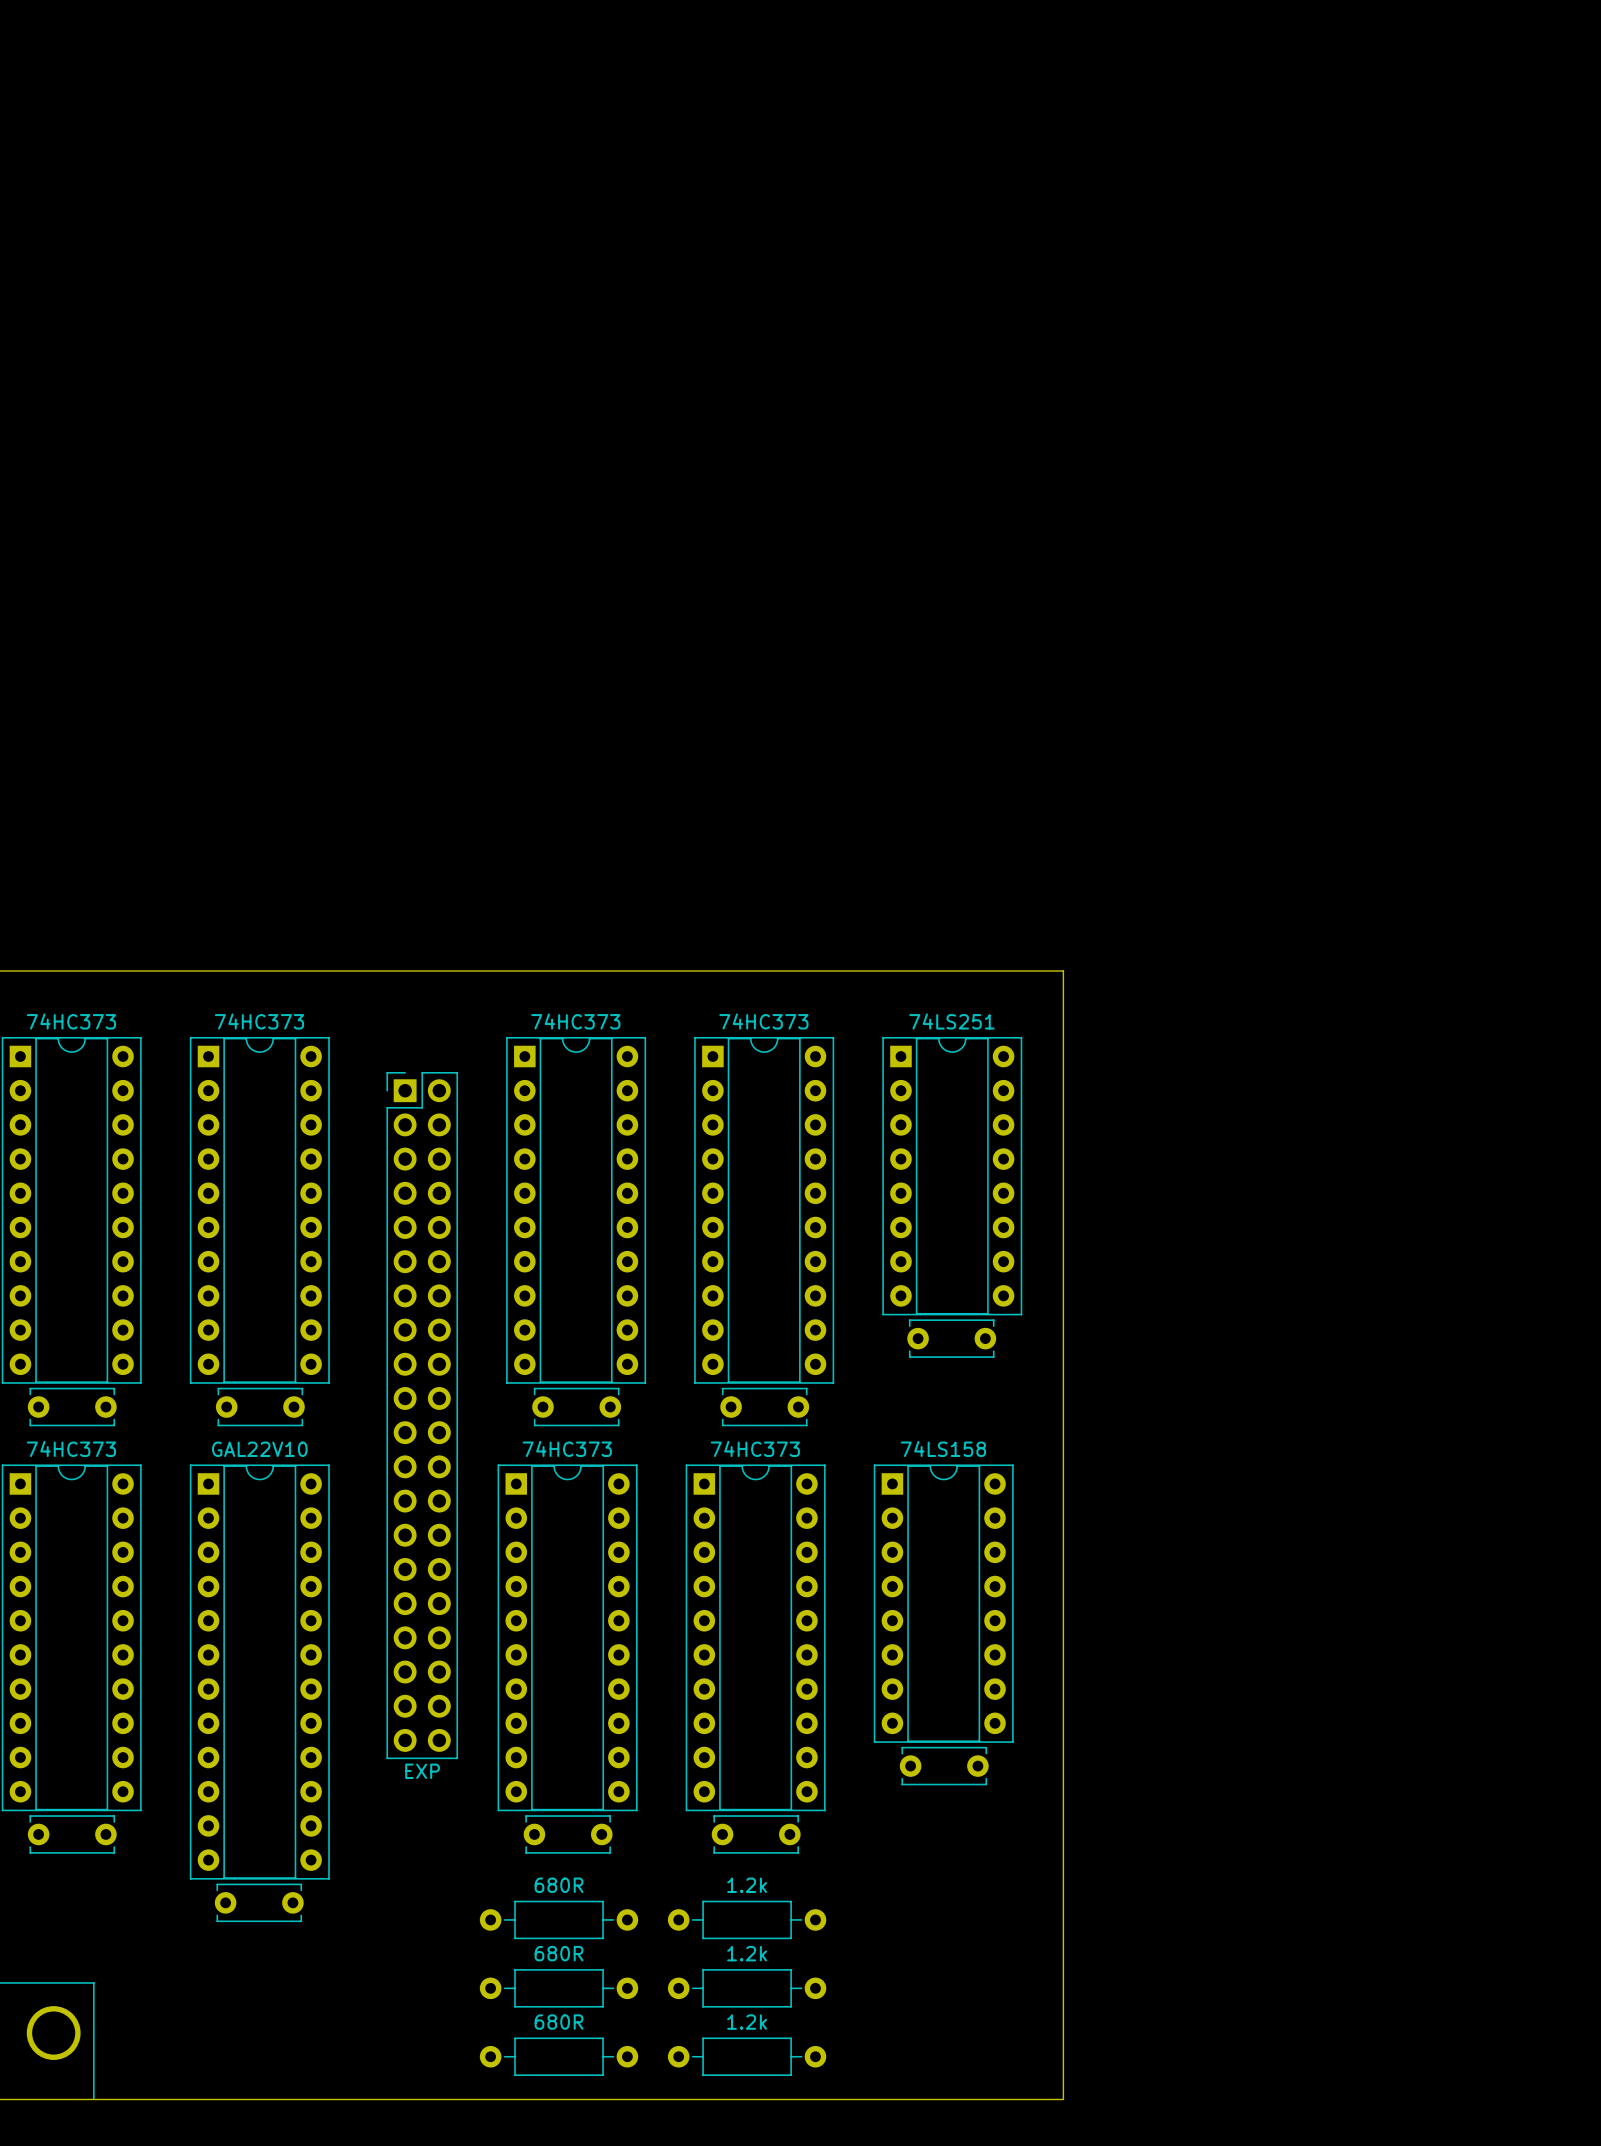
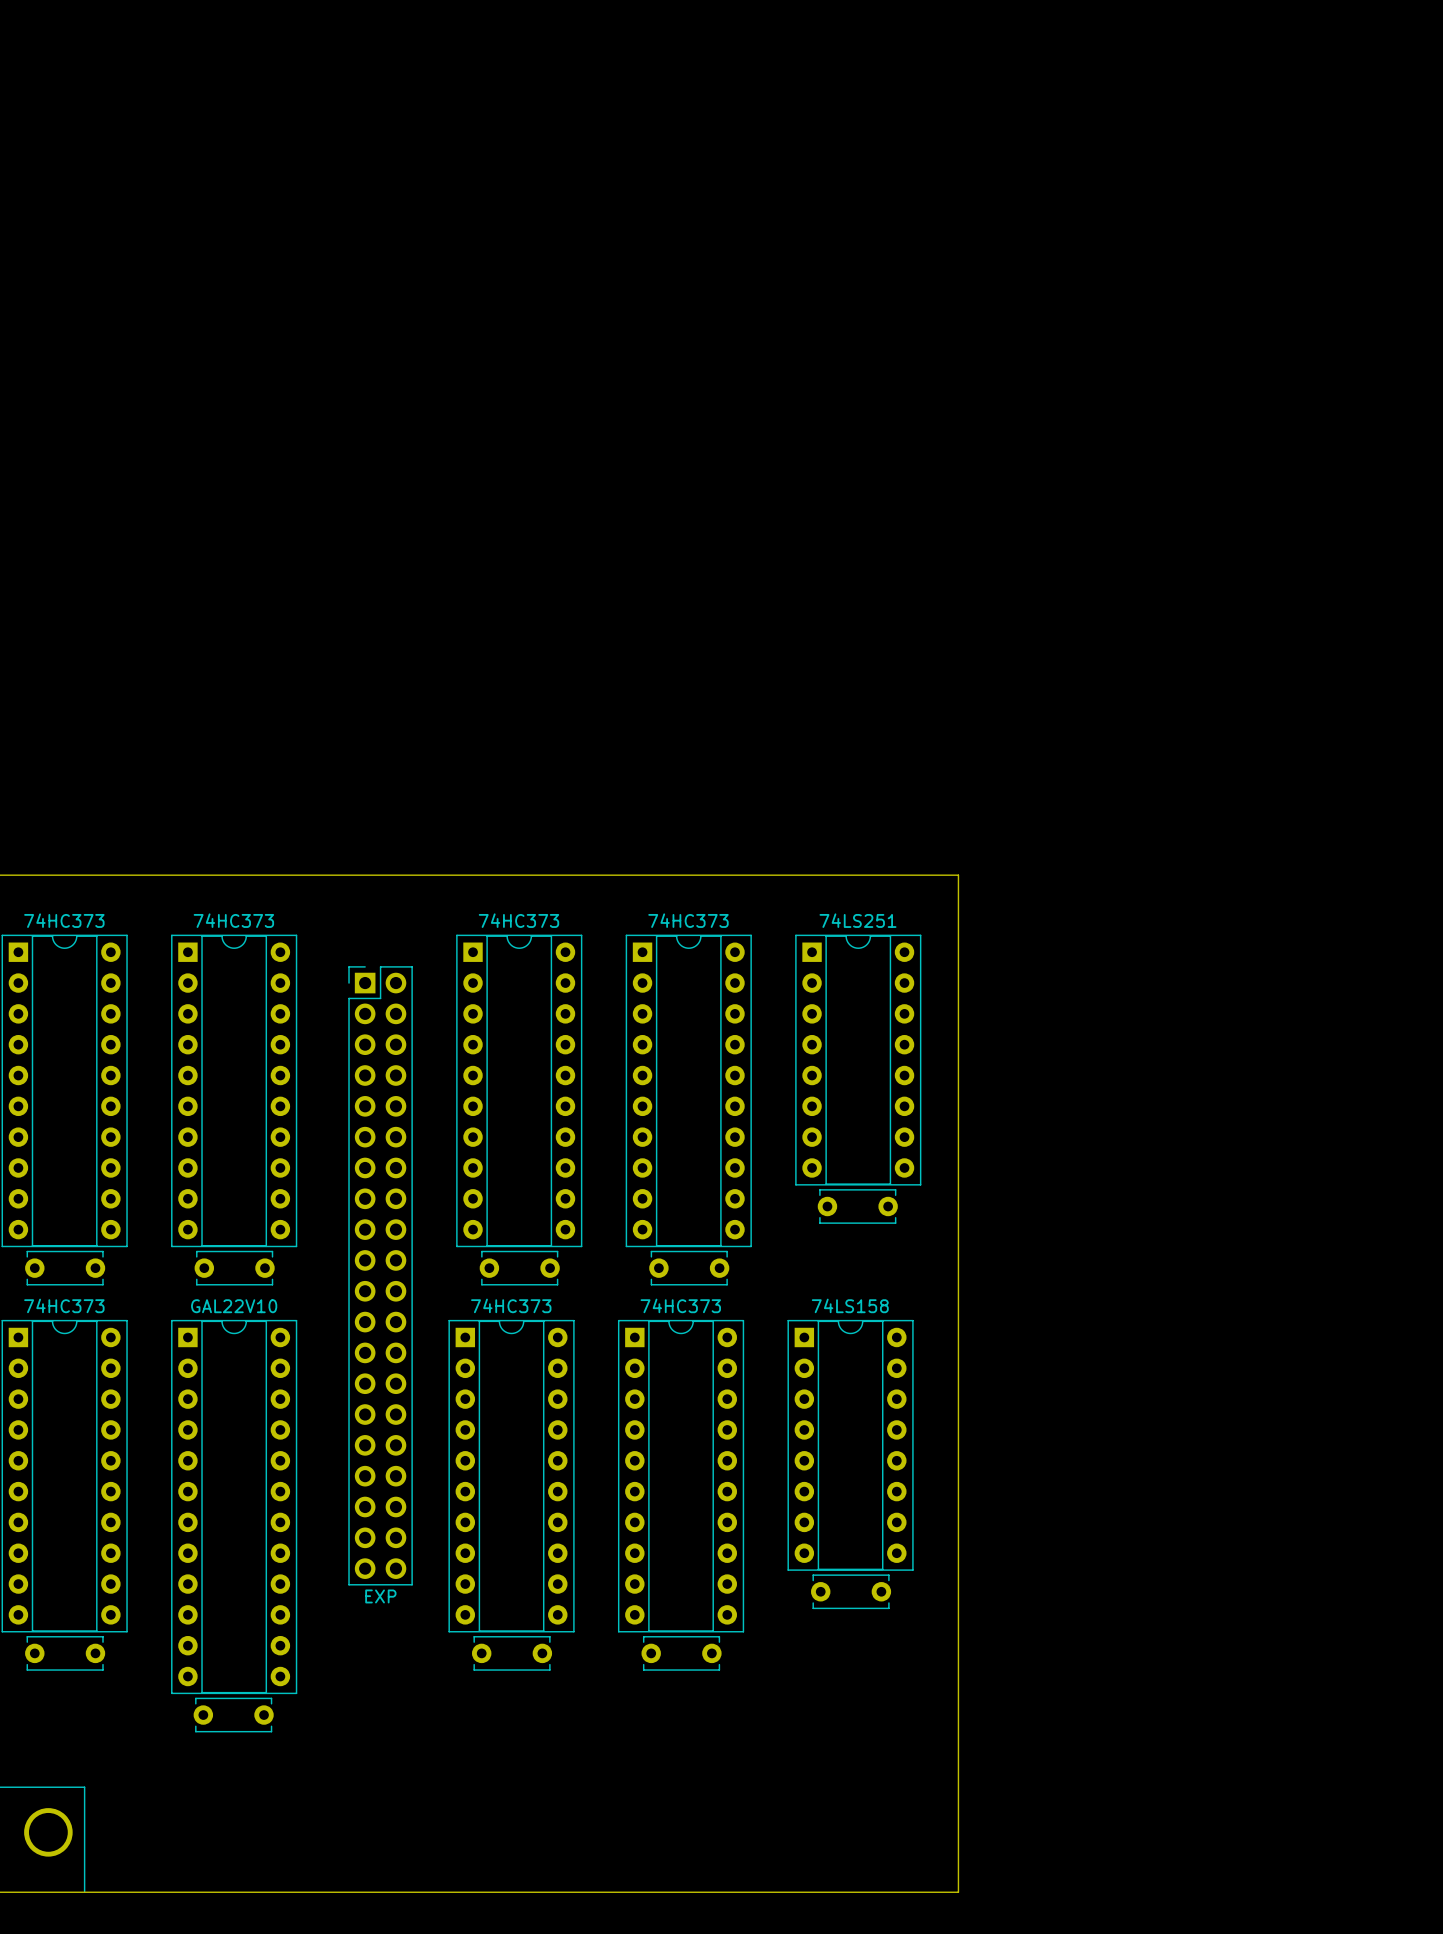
part: 680R (559, 1919) -> none
part: 1.2k (747, 1919) -> none
part: 680R (559, 1988) -> none
part: 1.2k (747, 1988) -> none
part: 680R (559, 2056) -> none
part: 1.2k (747, 2056) -> none

